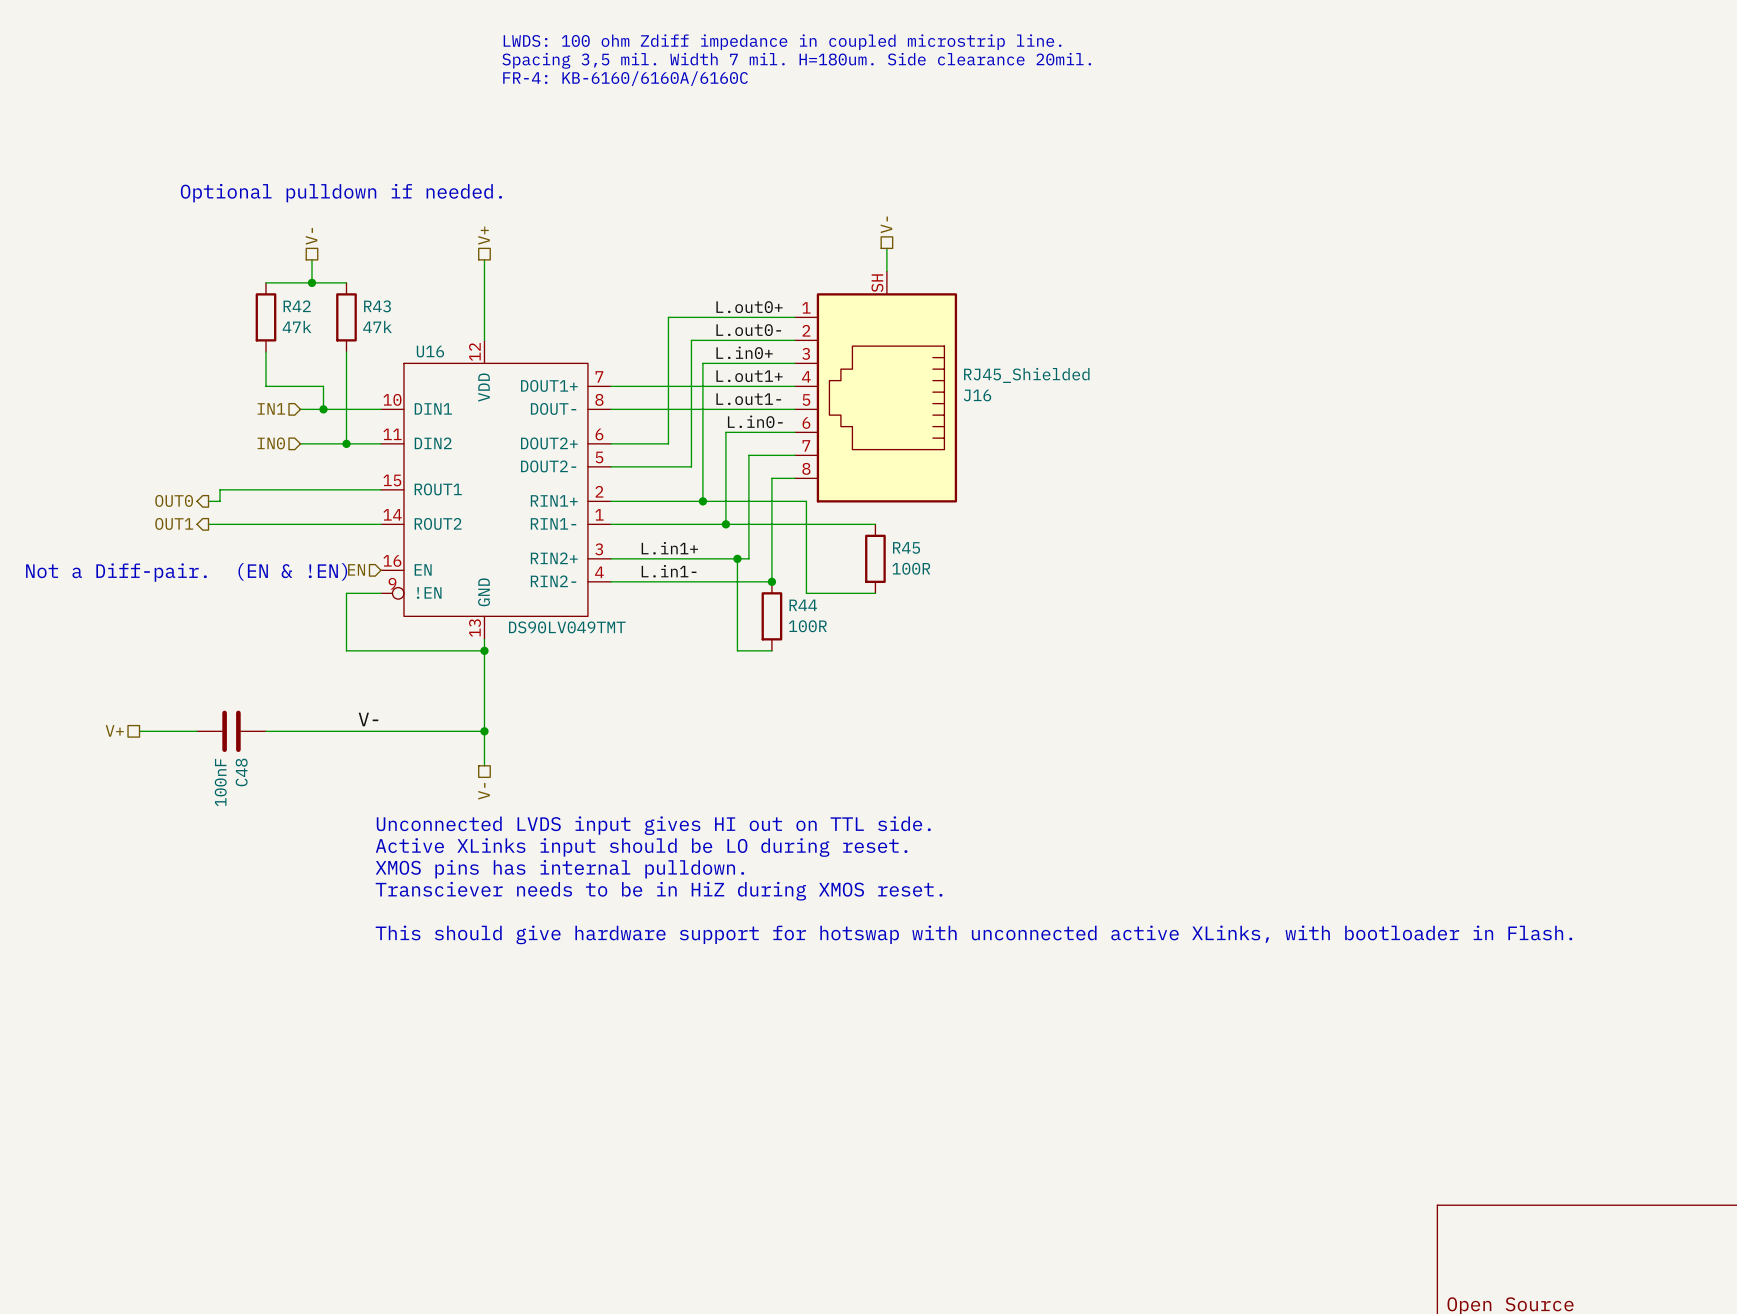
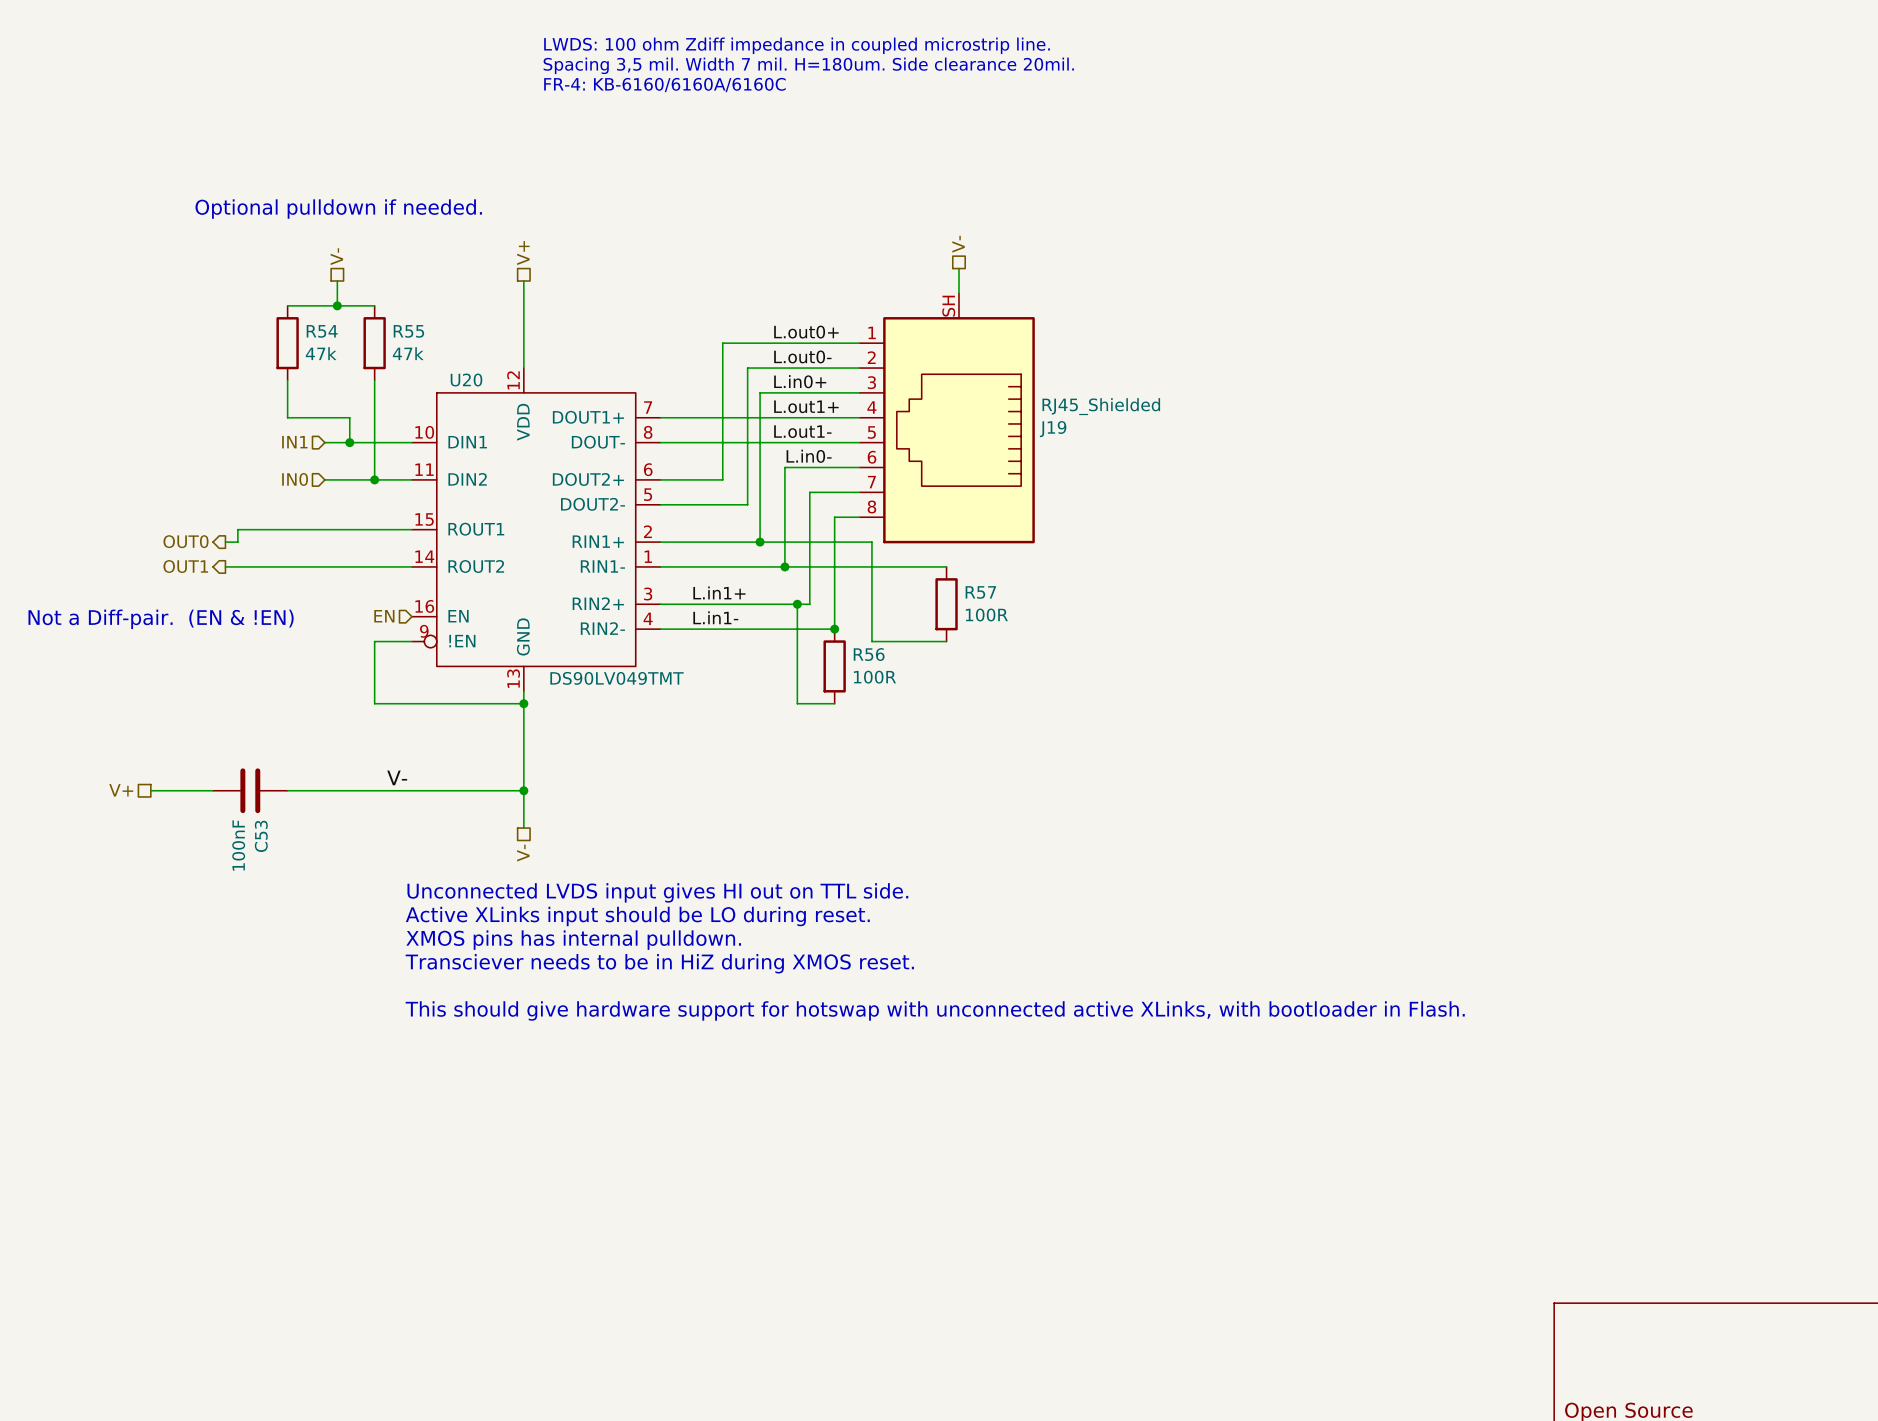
R42 name: R42 (297, 306) -> R54 (322, 331)
R43 name: R43 (377, 306) -> R55 (408, 331)
U16 name: U16 (430, 351) -> U20 (466, 380)
J16 name: J16 (977, 395) -> J19 (1053, 429)
R45 name: R45 (906, 547) -> R57 (980, 592)
R44 name: R44 (803, 605) -> R56 (869, 654)
C48 name: C48 (241, 772) -> C53 (261, 836)

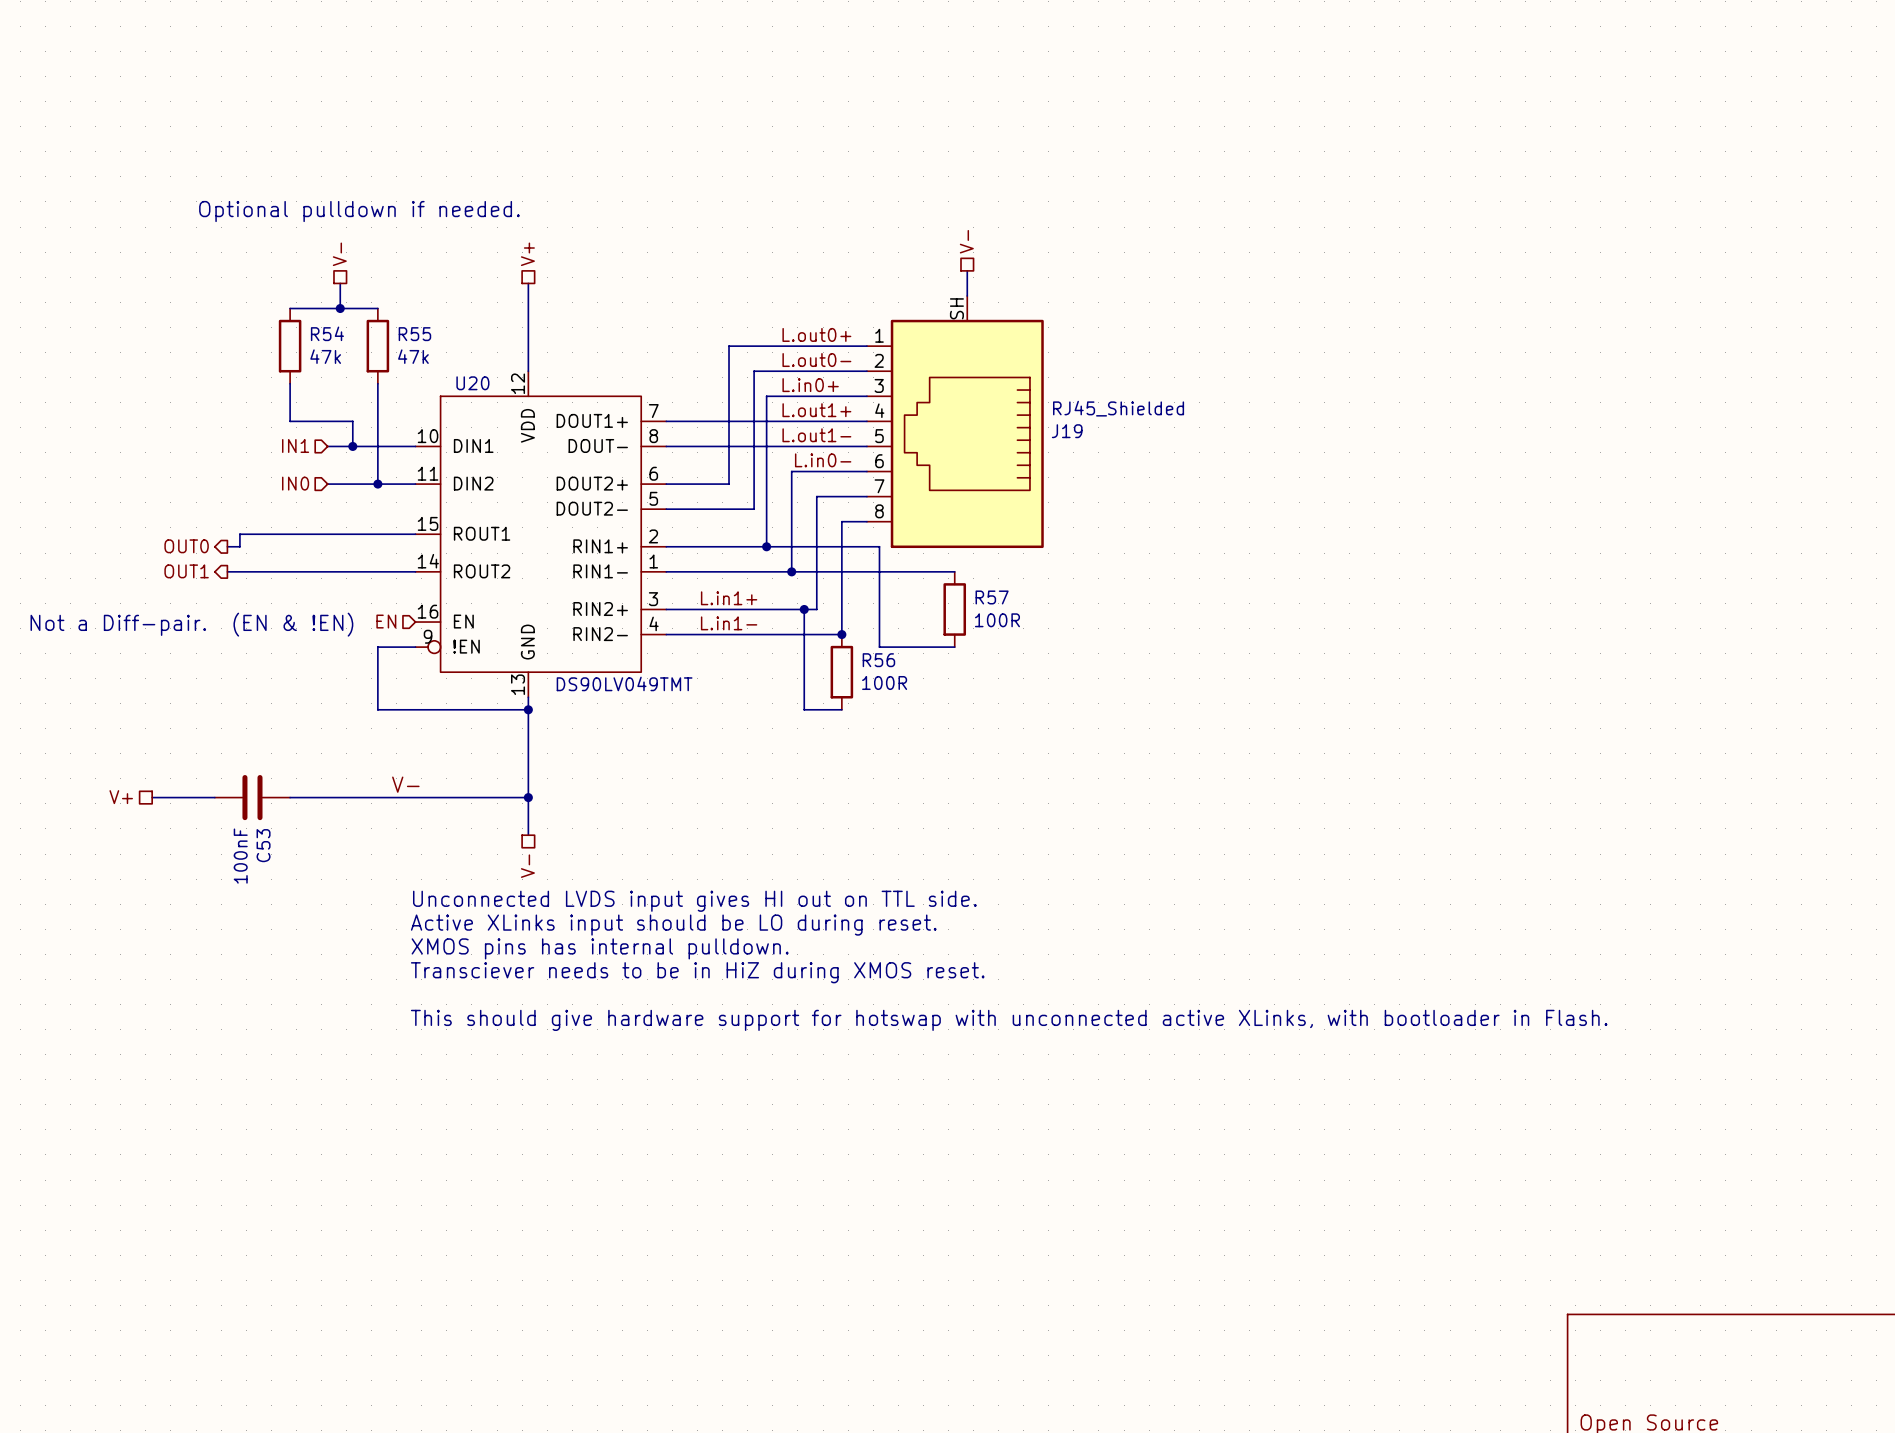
text: LWDS: 100 ohm Zdiff impedance in coupled microstrip line. (797, 45) -> none
text: Spacing 3,5 mil. Width 7 mil. H=180um. Side clearance 20mil. (808, 65) -> none
text: FR-4: KB-6160/6160A/6160C (664, 85) -> none

